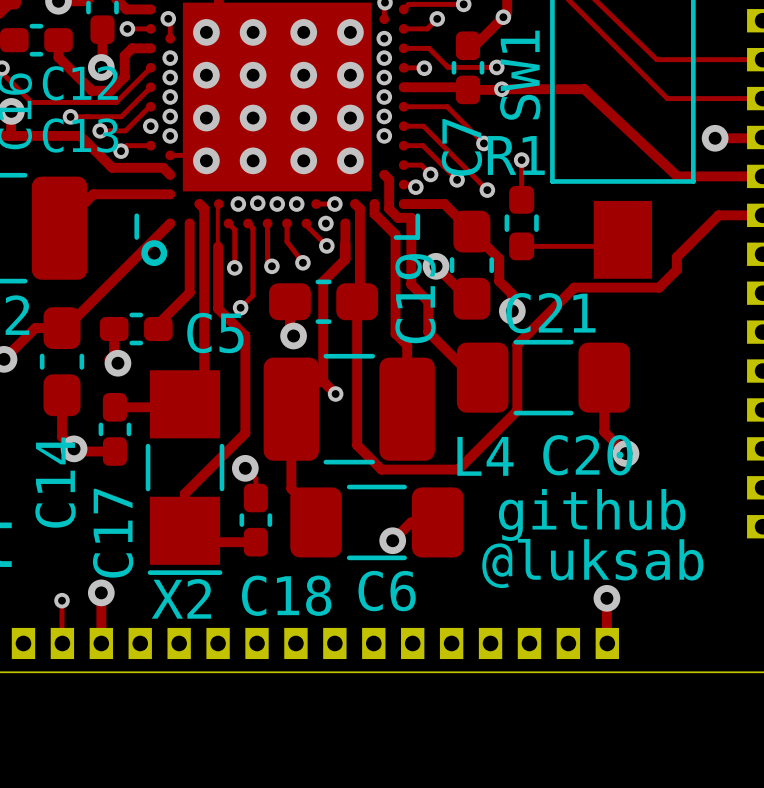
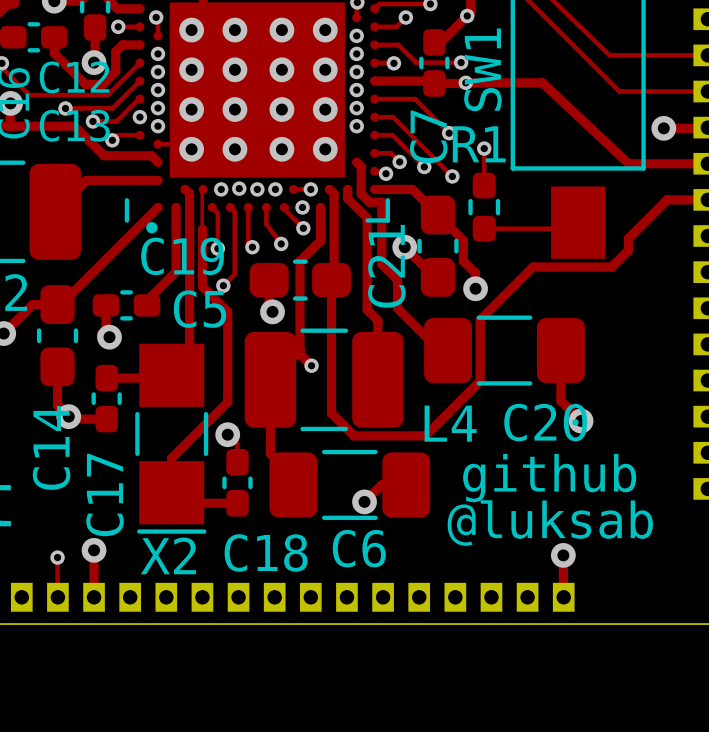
drawing shape: [141, 240, 168, 267] -> [146, 222, 158, 234]
C19 name rotation: 0° (415, 298) -> 90° clockwise (182, 256)
C19 name position: C19 (415, 298) -> C19 (182, 256)
C21 name rotation: 0° (550, 313) -> 90° counterclockwise (386, 266)

